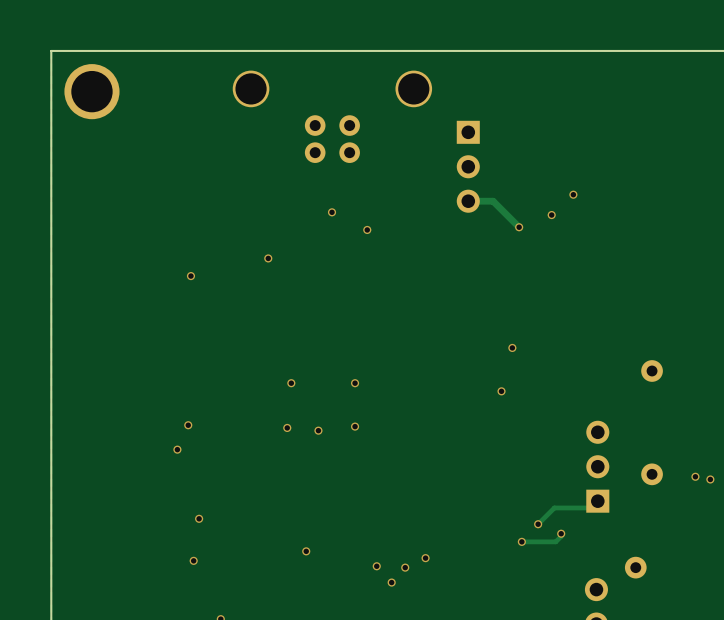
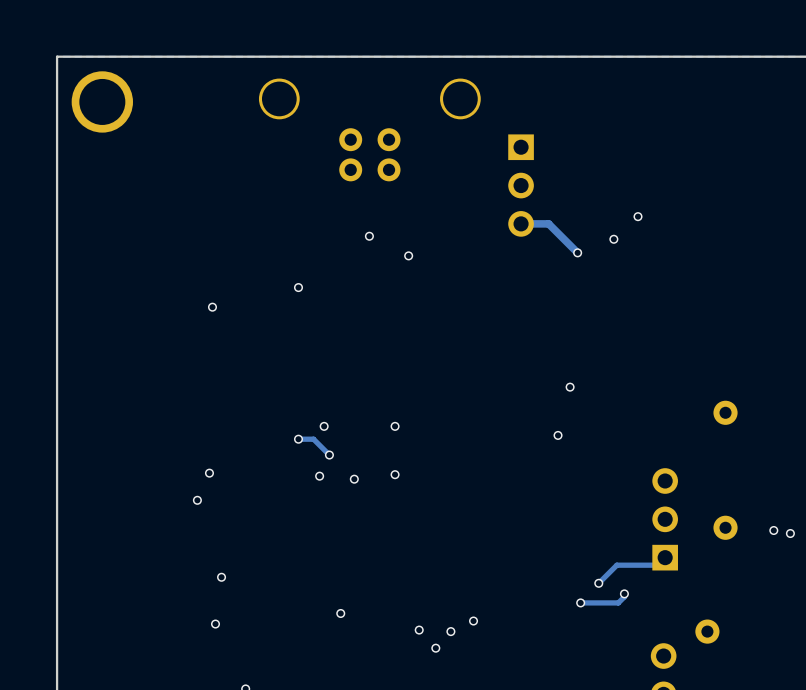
track: none -> (298, 439) (313, 439) (329, 455)
via: none -> (298, 439)
via: none -> (329, 455)

